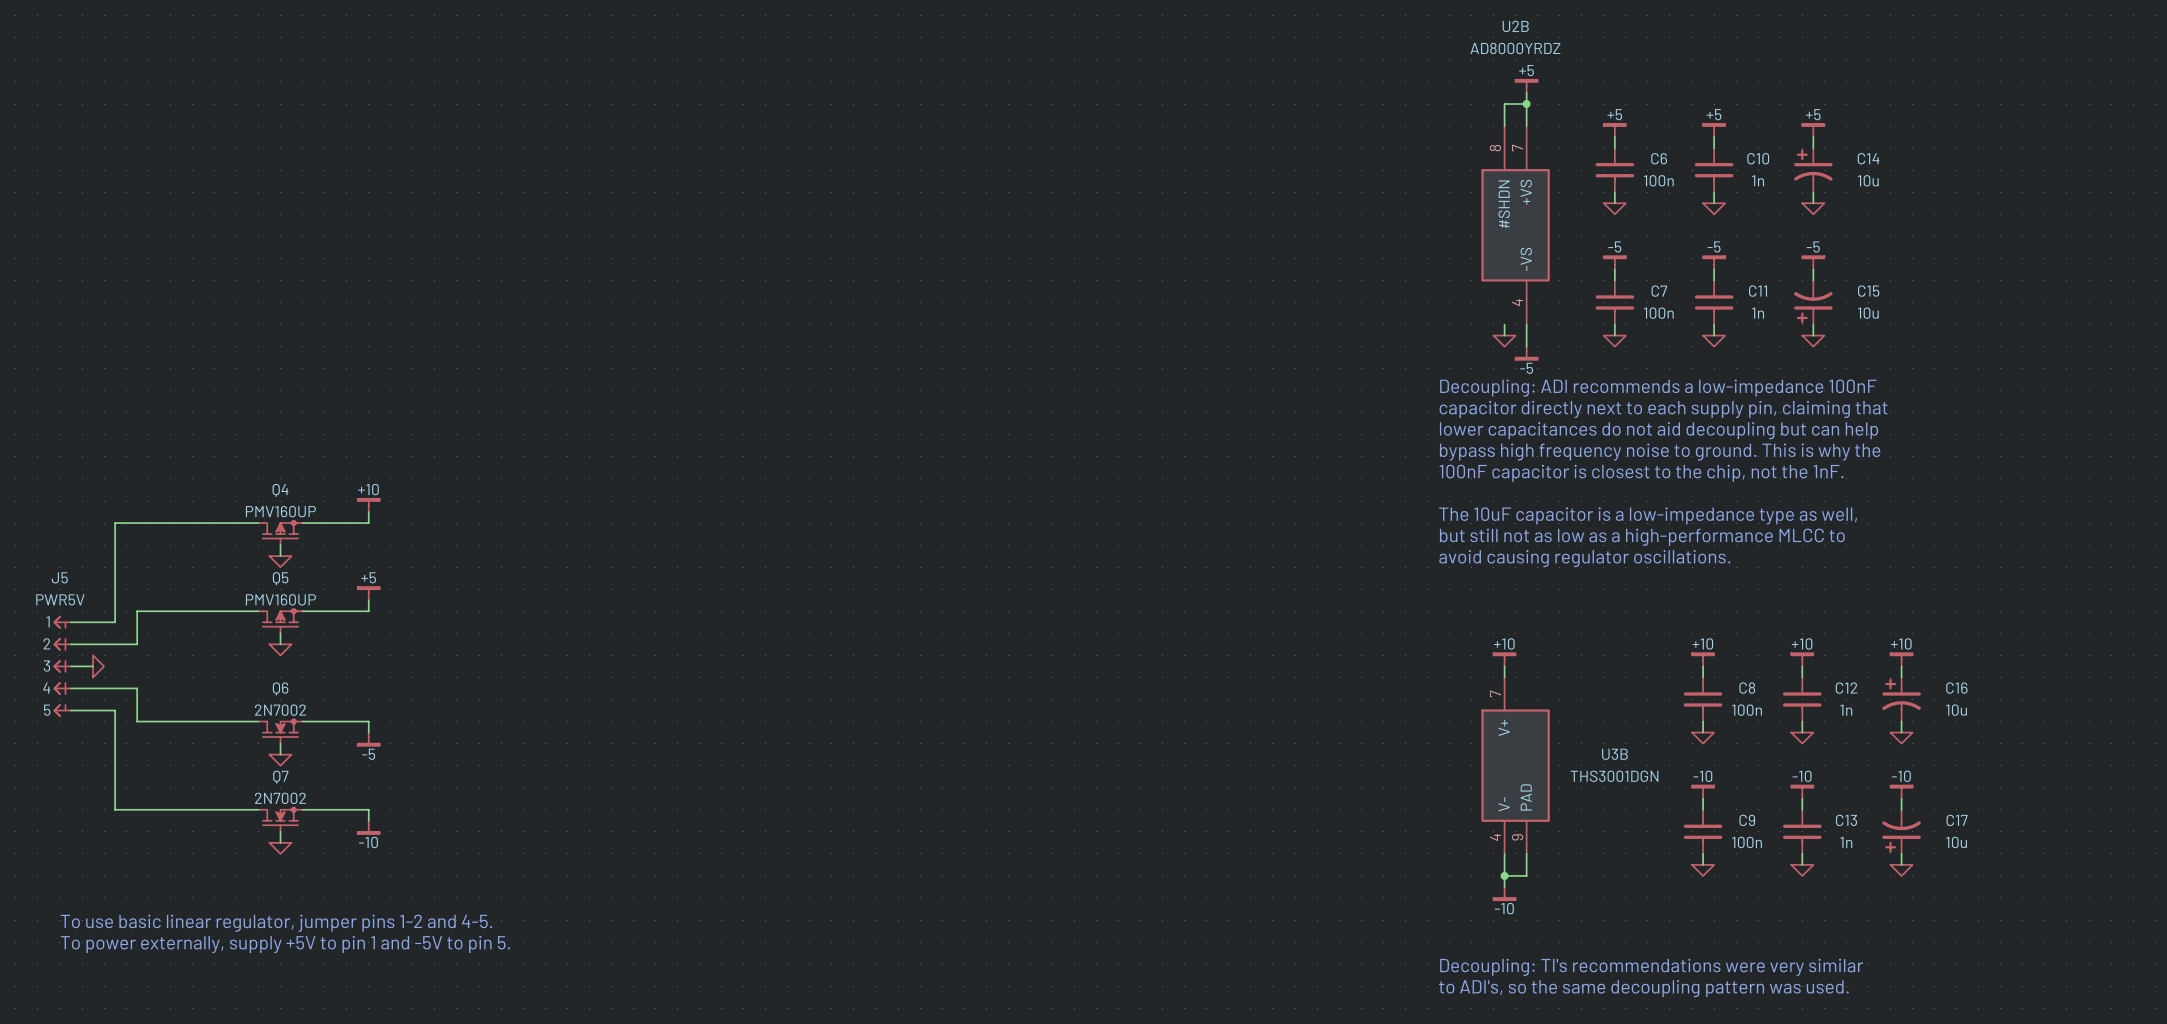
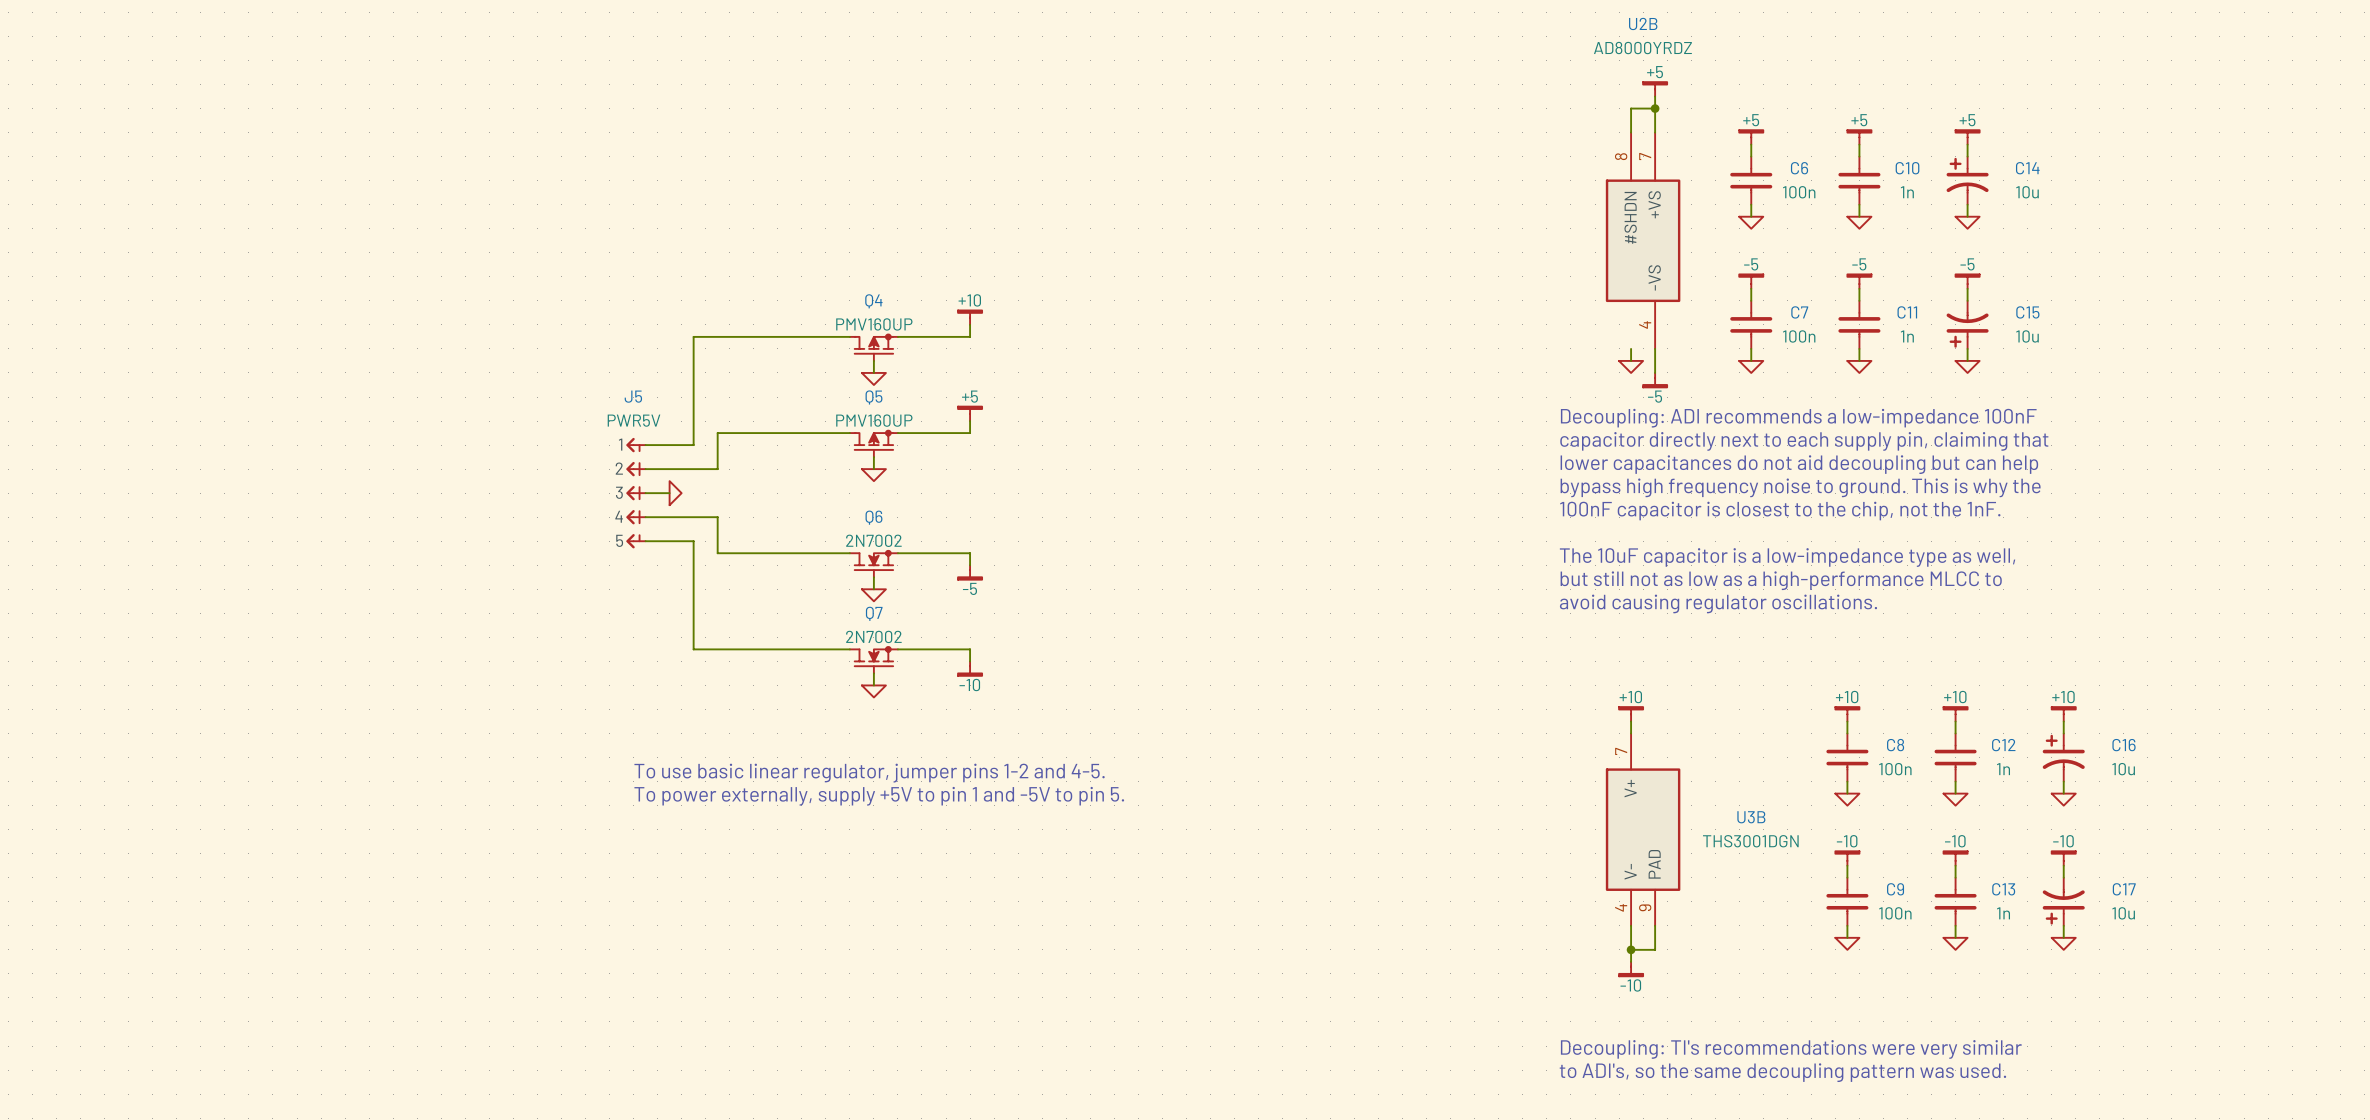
power symbol: none -> +10 (970, 317)
wire: none -> (970, 324) (970, 336) (897, 336)
wire: none -> (849, 336) (693, 336) (693, 445) (645, 445)
wire: none -> (873, 360) (873, 372)
power symbol: none -> (873, 378)
power symbol: none -> +5 (970, 413)
wire: none -> (970, 421) (970, 433) (897, 433)
wire: none -> (849, 433) (717, 433) (717, 469) (645, 469)
wire: none -> (873, 457) (873, 469)
power symbol: none -> (873, 475)
wire: none -> (645, 493) (669, 493)
power symbol: none -> (675, 493)
wire: none -> (645, 517) (717, 517) (717, 553) (849, 553)
wire: none -> (645, 541) (693, 541) (693, 649) (849, 649)
power symbol: +10 (368, 505) -> none
wire: (368, 512) (368, 523) (302, 523) -> none
wire: none -> (897, 553) (970, 553) (970, 565)
wire: (258, 523) (115, 523) (115, 622) (70, 622) -> none
power symbol: none -> -5 (970, 572)
Q4 position: (280, 532) -> (873, 347)
wire: none -> (873, 577) (873, 589)
wire: (280, 545) (280, 556) -> none
power symbol: none -> (873, 595)
power symbol: (280, 561) -> none
power symbol: +5 (368, 593) -> none
wire: (368, 600) (368, 611) (302, 611) -> none
wire: none -> (897, 649) (970, 649) (970, 661)
wire: (258, 611) (137, 611) (137, 644) (70, 644) -> none
power symbol: none -> -10 (970, 668)
Q5 position: (280, 621) -> (873, 443)
wire: none -> (873, 673) (873, 685)
wire: (280, 633) (280, 644) -> none
power symbol: none -> (873, 691)
power symbol: (280, 649) -> none
J5 position: (62, 666) -> (635, 493)
wire: (70, 666) (93, 666) -> none
power symbol: (98, 666) -> none
wire: (70, 688) (137, 688) (137, 721) (258, 721) -> none
wire: (70, 710) (115, 710) (115, 809) (258, 809) -> none
text: none -> To use basic linear regulator, jumper pins 1-2 and 4-5. (869, 773)
wire: (302, 721) (368, 721) (368, 732) -> none
Q6 position: (280, 731) -> (873, 564)
text: none -> To power externally, supply +5V to pin 1 and -5V to pin 5. (879, 796)
power symbol: -5 (368, 739) -> none
wire: (280, 743) (280, 754) -> none
power symbol: (280, 760) -> none
wire: (302, 809) (368, 809) (368, 820) -> none
Q7 position: (280, 819) -> (873, 660)
power symbol: -10 (368, 827) -> none
wire: (280, 831) (280, 842) -> none
power symbol: (280, 848) -> none
text: To use basic linear regulator, jumper pins 1-2 and 4-5. (276, 923) -> none
text: To power externally, supply +5V to pin 1 and -5V to pin 5. (285, 944) -> none

